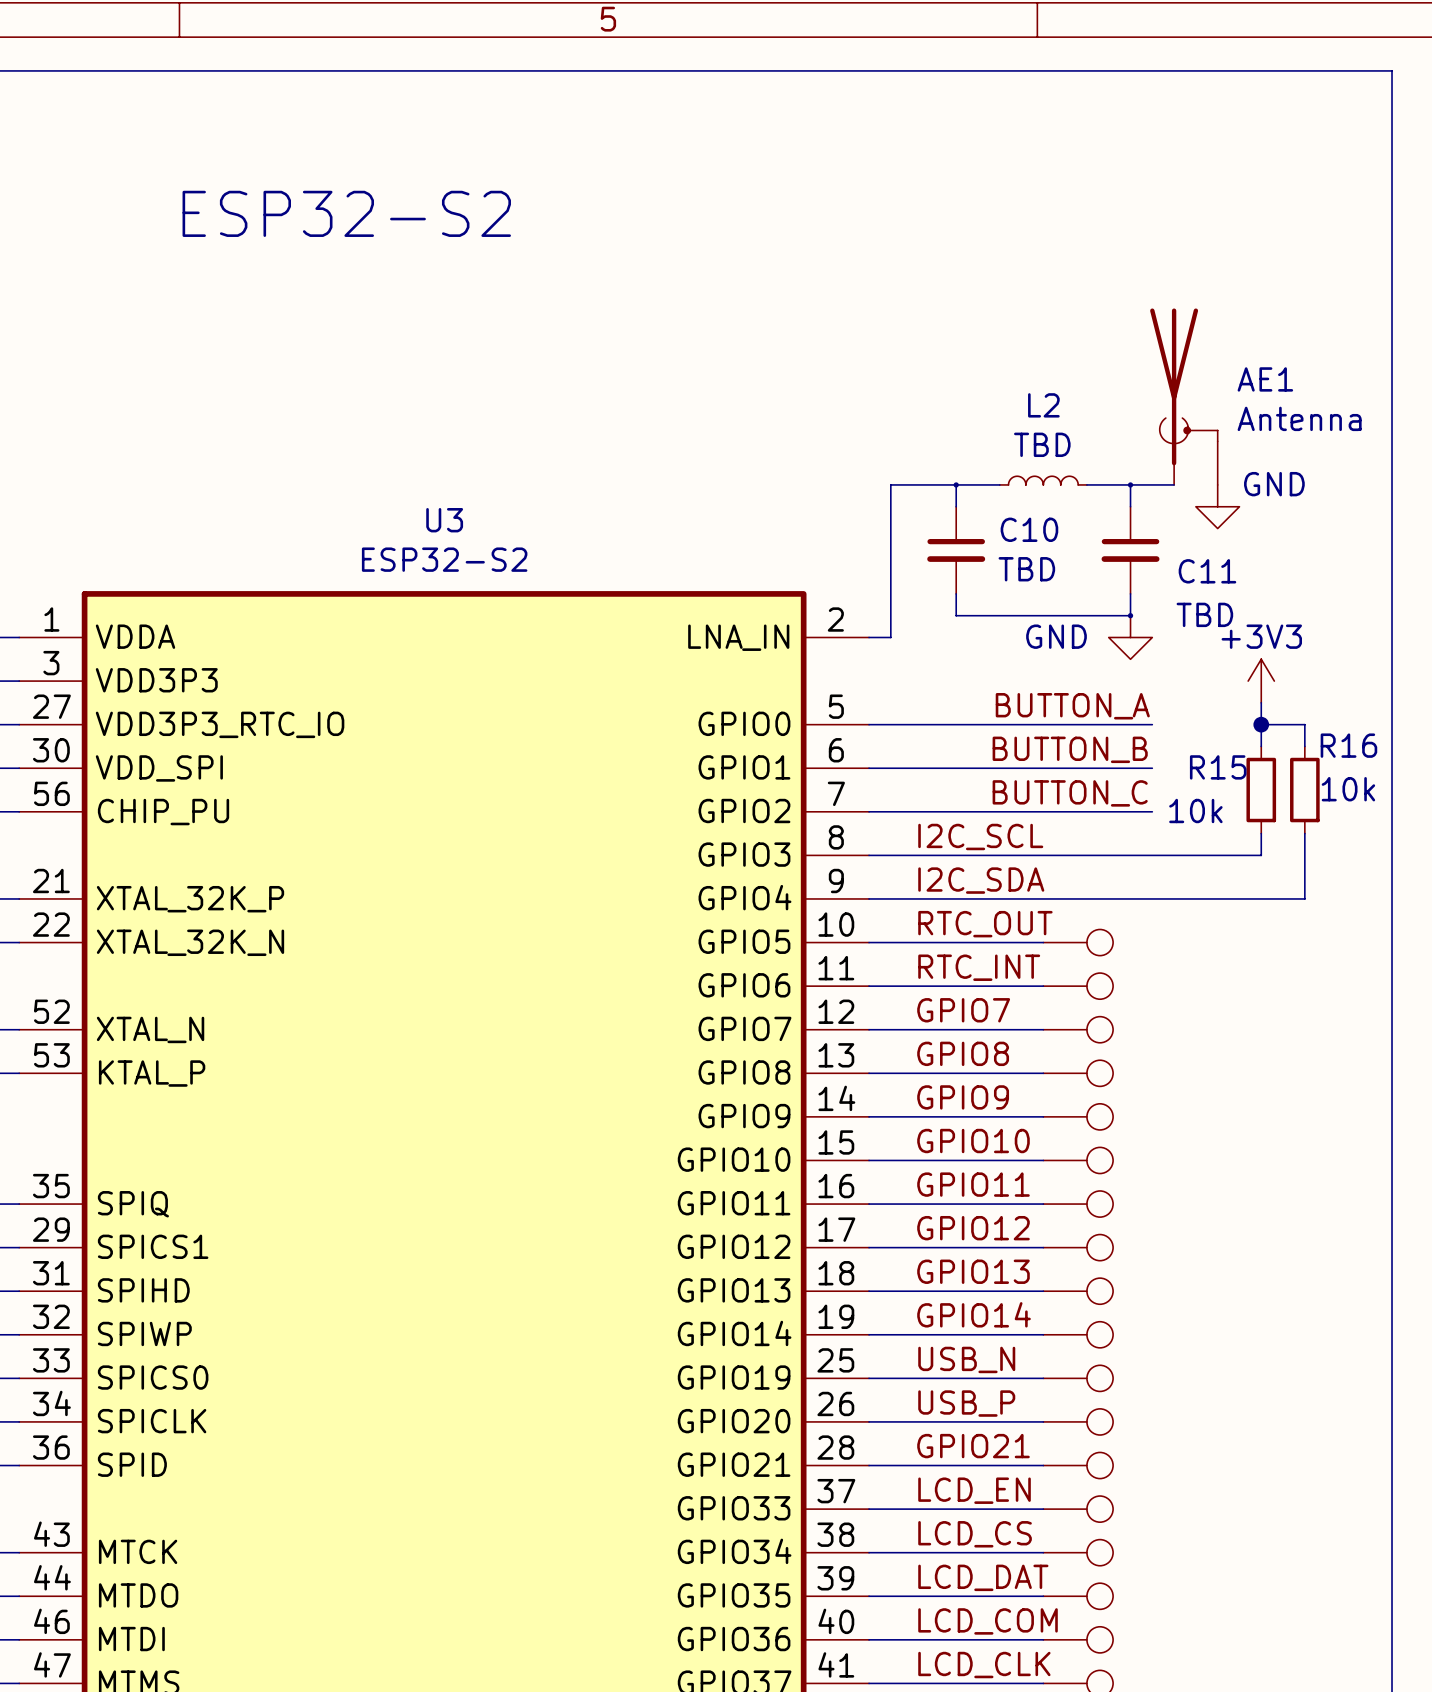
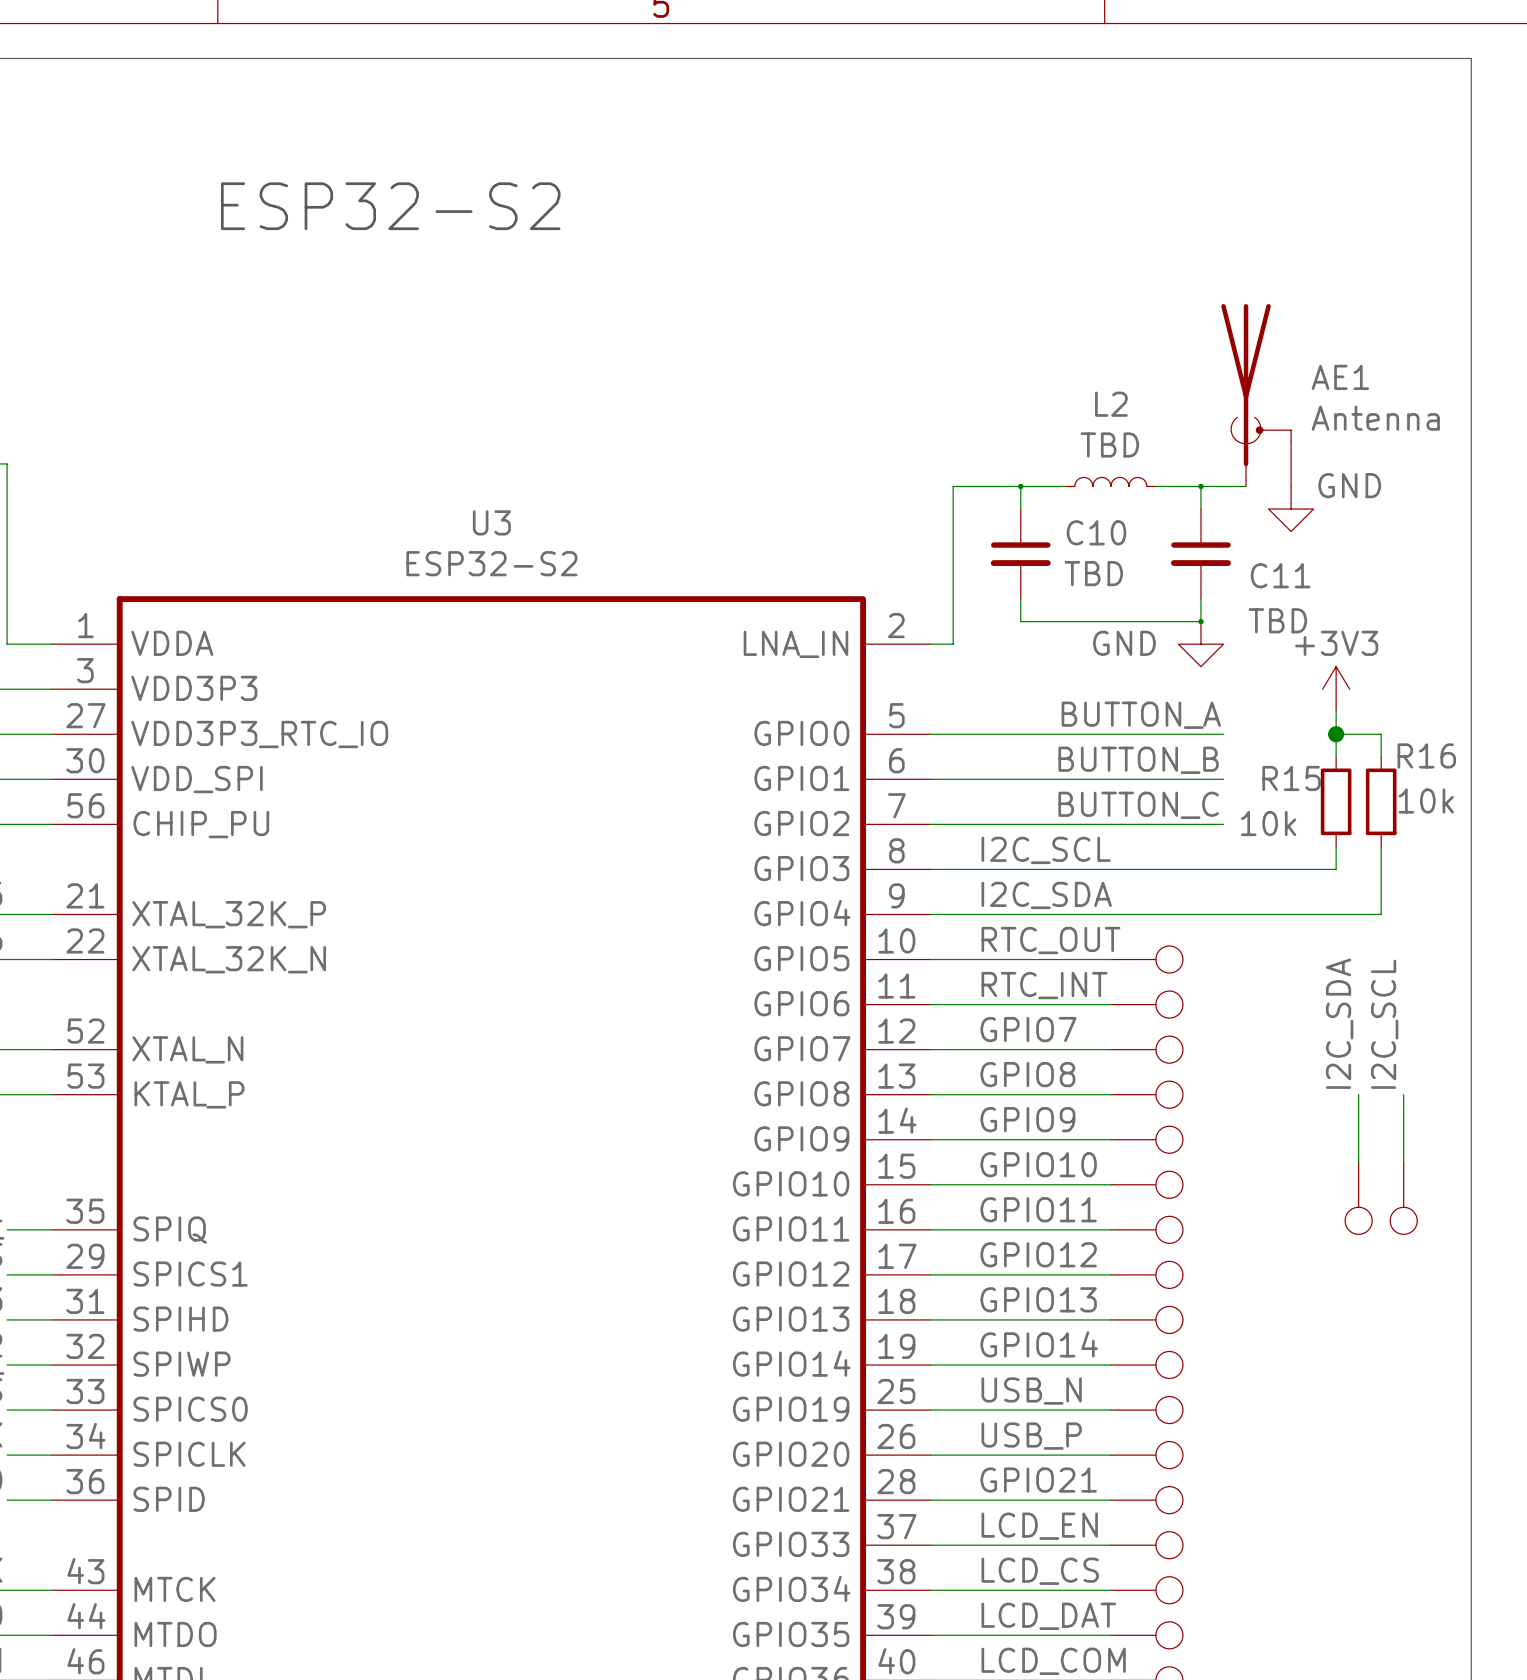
label: none -> I2C_SDA (1339, 1023)
label: none -> I2C_SCL (1384, 1024)
wire: none -> (1358, 1094) (1358, 1162)
wire: none -> (1403, 1094) (1403, 1162)
part: none -> (1358, 1198)
part: none -> (1403, 1198)

